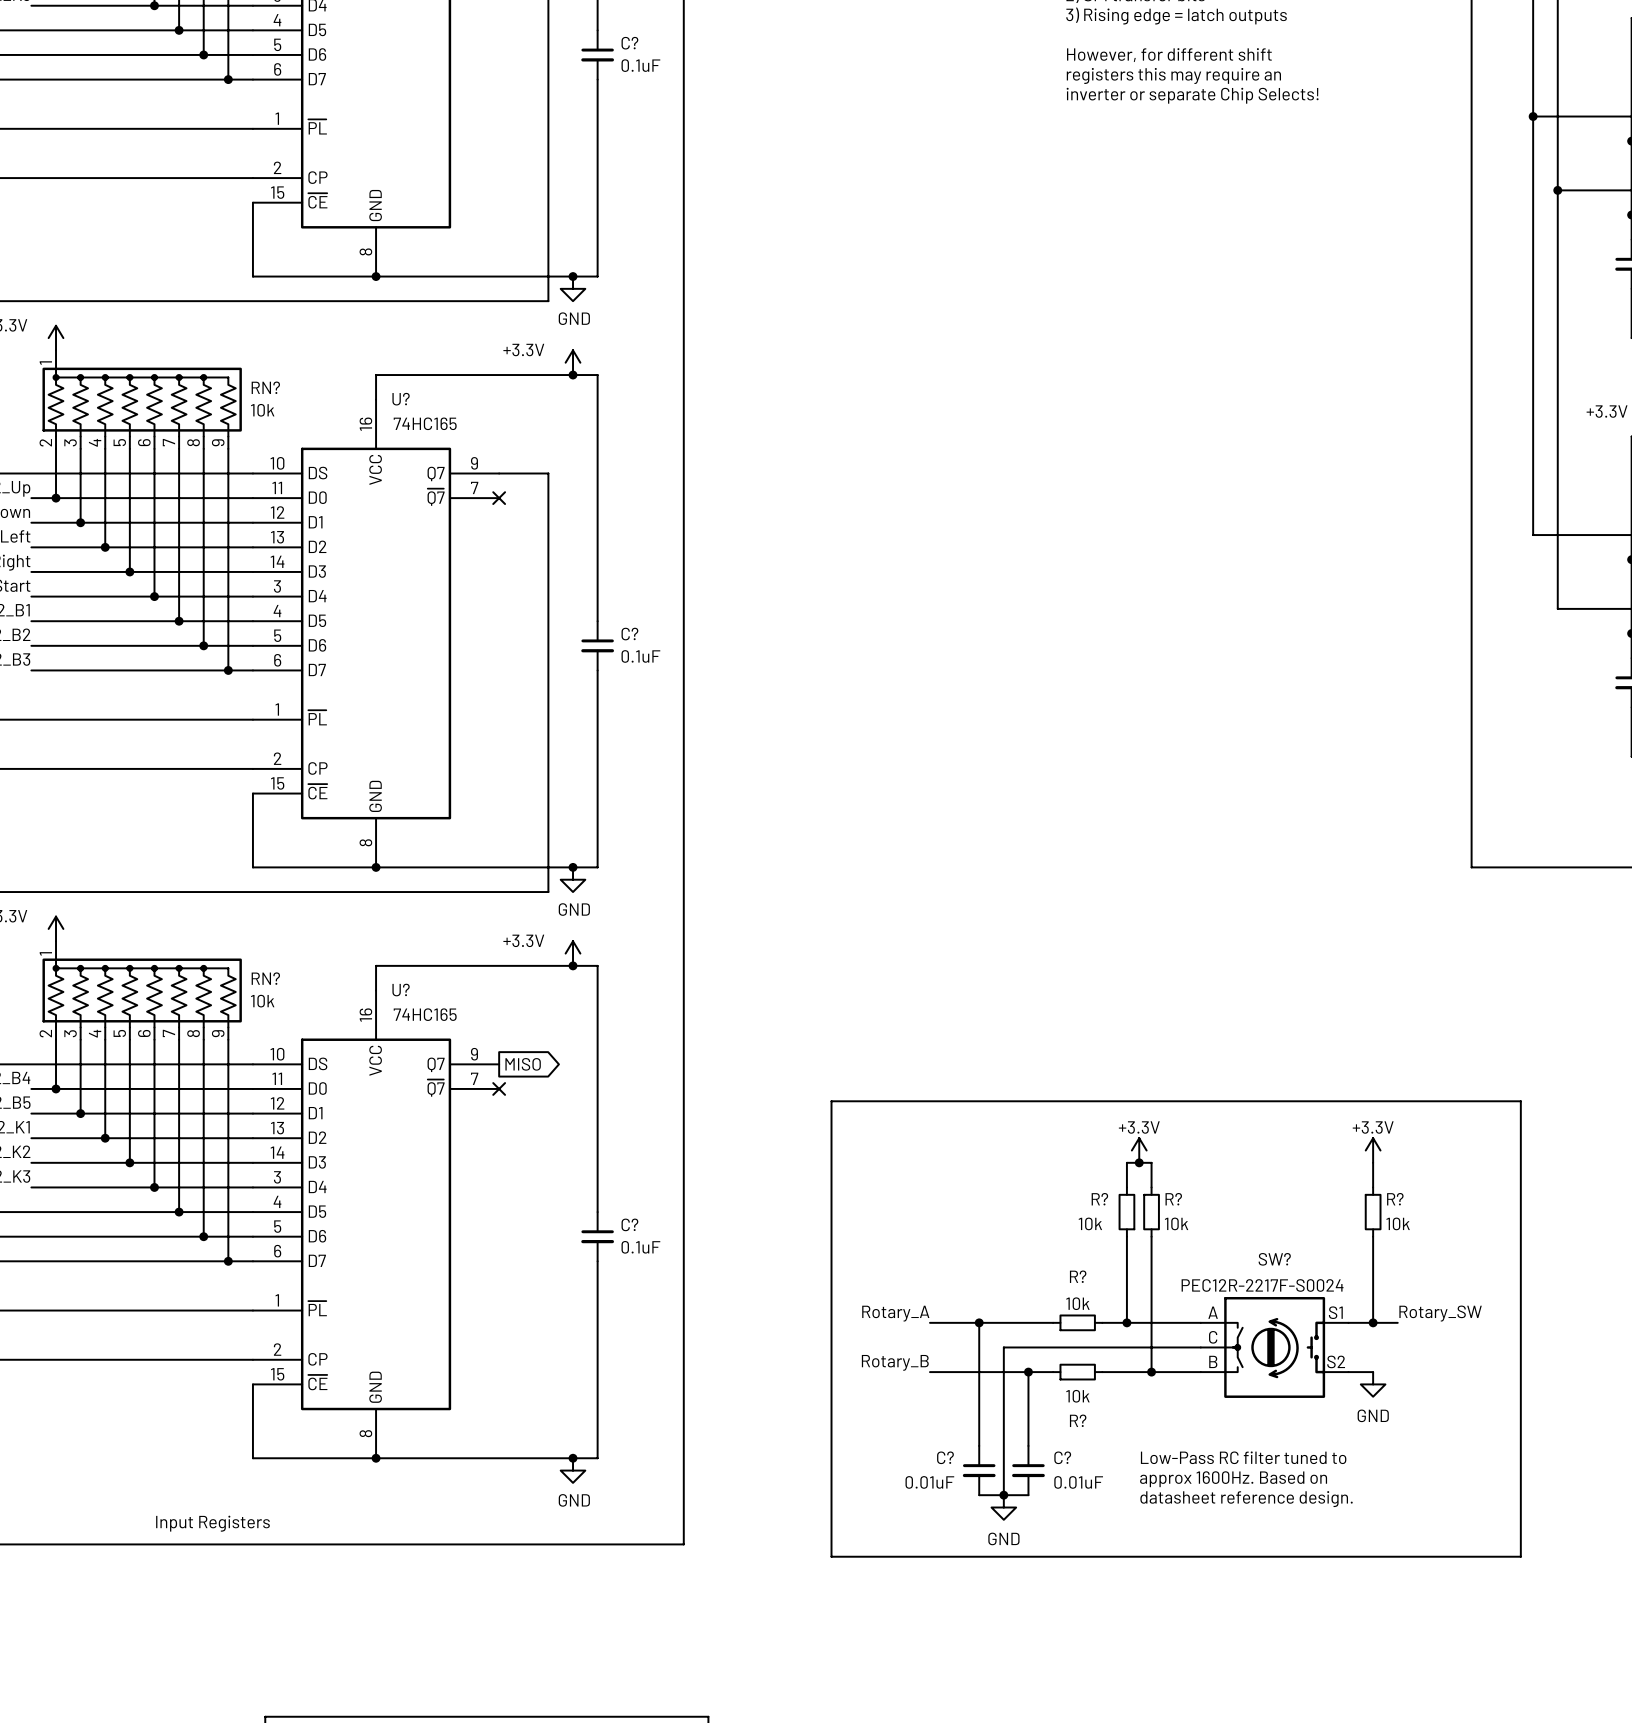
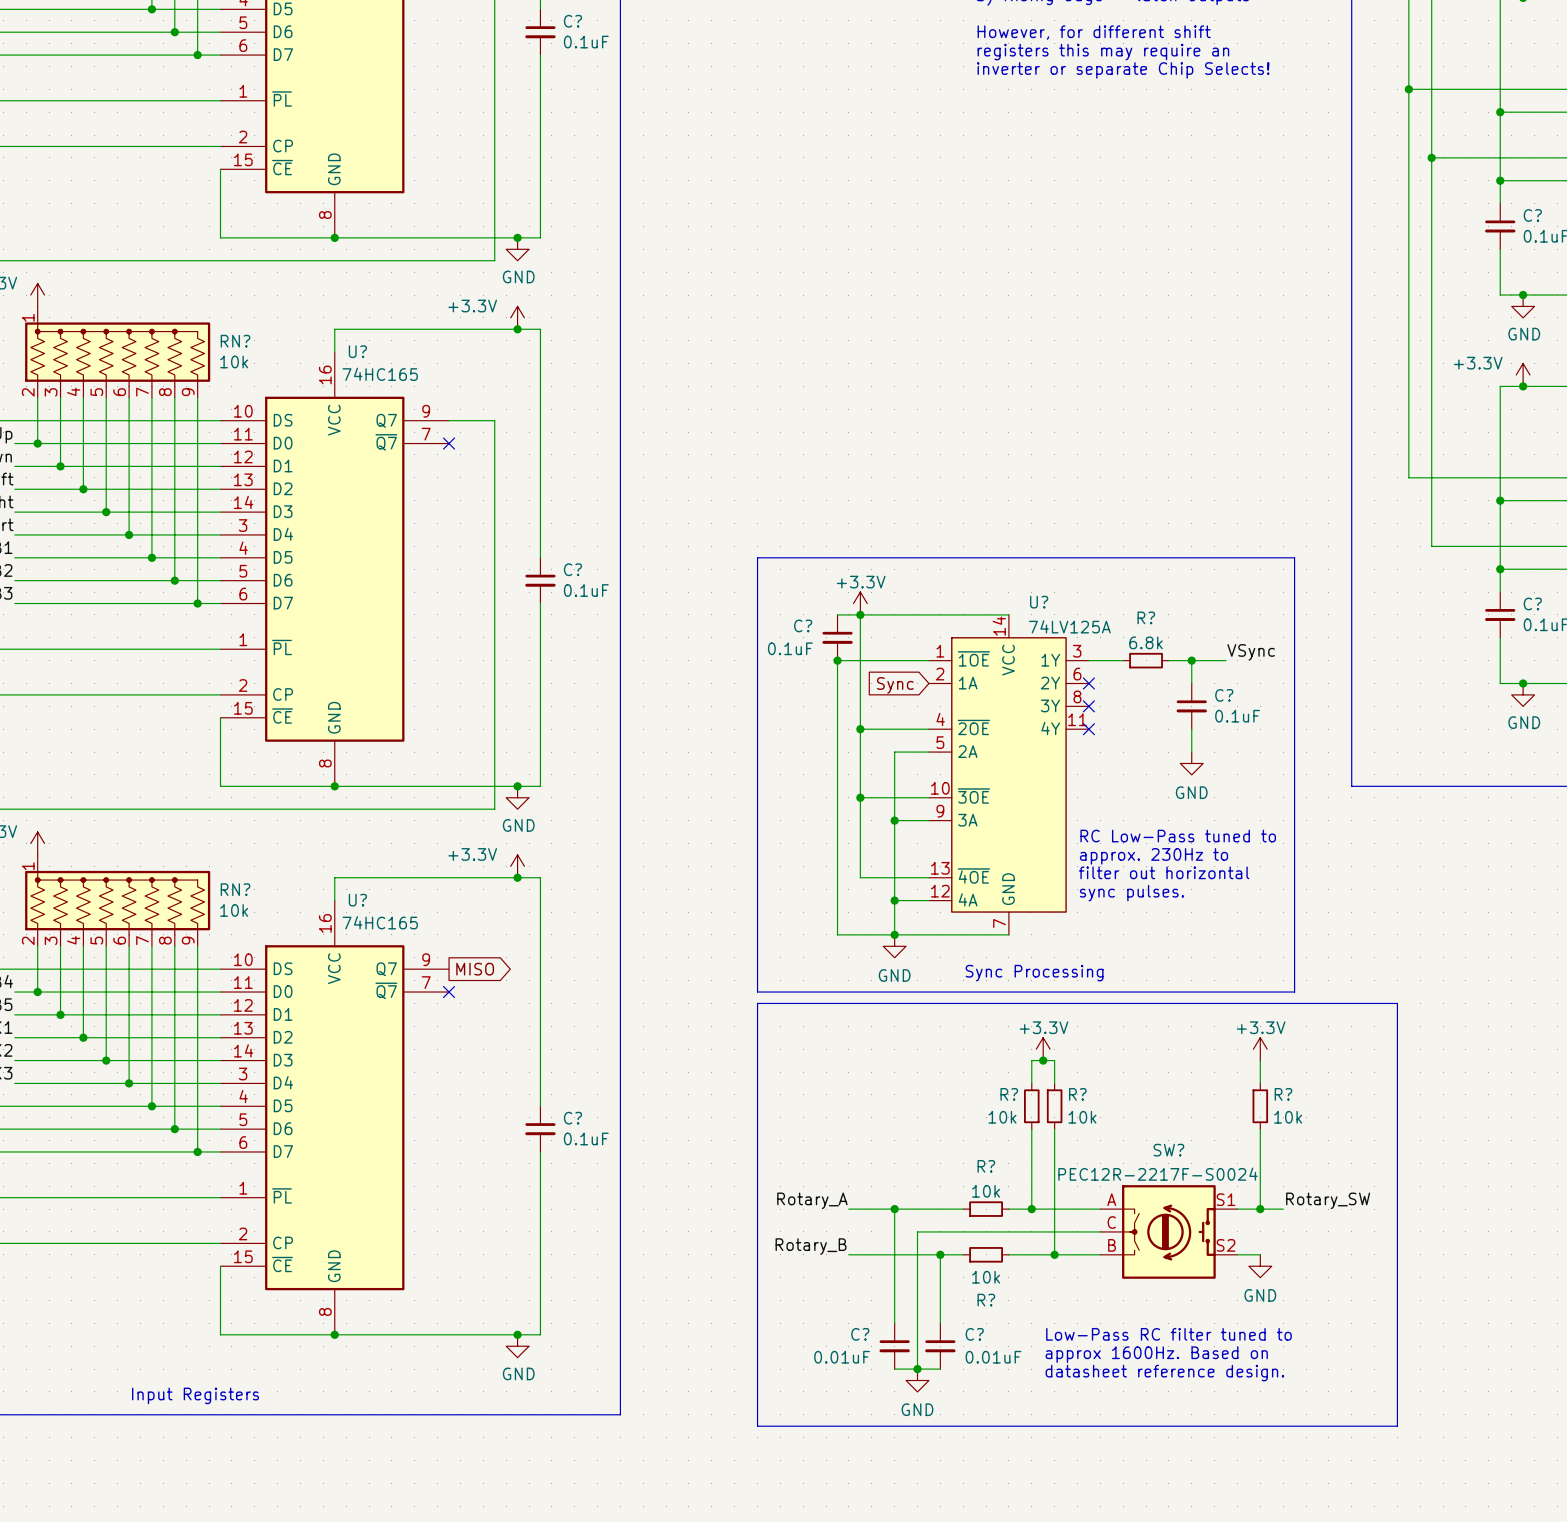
line: none -> (757, 557) (757, 992) (1294, 992) (1294, 557) (757, 557)
power symbol: none -> +3.3V (860, 603)
wire: none -> (837, 614) (1008, 614)
wire: none -> (860, 614) (860, 877) (928, 877)
junction: none -> (860, 614)
C?: none -> 0.1uF (837, 637)
label: none -> VSync (1251, 652)
junction: none -> (837, 660)
wire: none -> (928, 660) (837, 660) (837, 934) (1008, 934)
wire: none -> (1088, 660) (1123, 660)
R?: none -> 6.8k (1146, 660)
wire: none -> (1168, 660) (1226, 660)
wire: none -> (1191, 660) (1191, 683)
junction: none -> (1191, 660)
no-connect mark: none -> (1088, 683)
global label: none -> Sync (895, 685)
no-connect mark: none -> (1088, 706)
C?: none -> 0.1uF (1191, 706)
wire: none -> (860, 729) (928, 729)
junction: none -> (860, 729)
no-connect mark: none -> (1088, 729)
wire: none -> (1191, 729) (1191, 752)
wire: none -> (928, 752) (894, 752) (894, 934)
power symbol: none -> GND (1191, 763)
U?: none -> 74LV125A (1008, 774)
wire: none -> (860, 797) (928, 797)
junction: none -> (860, 797)
wire: none -> (894, 820) (928, 820)
junction: none -> (894, 820)
text: none -> RC Low-Pass tuned to (1178, 836)
text: none -> approx. 230Hz to (1154, 856)
text: none -> filter out horizontal (1164, 872)
text: none -> sync pulses. (1131, 893)
wire: none -> (894, 900) (928, 900)
junction: none -> (894, 900)
junction: none -> (894, 934)
power symbol: none -> GND (894, 946)
text: none -> Sync Processing (1034, 973)

